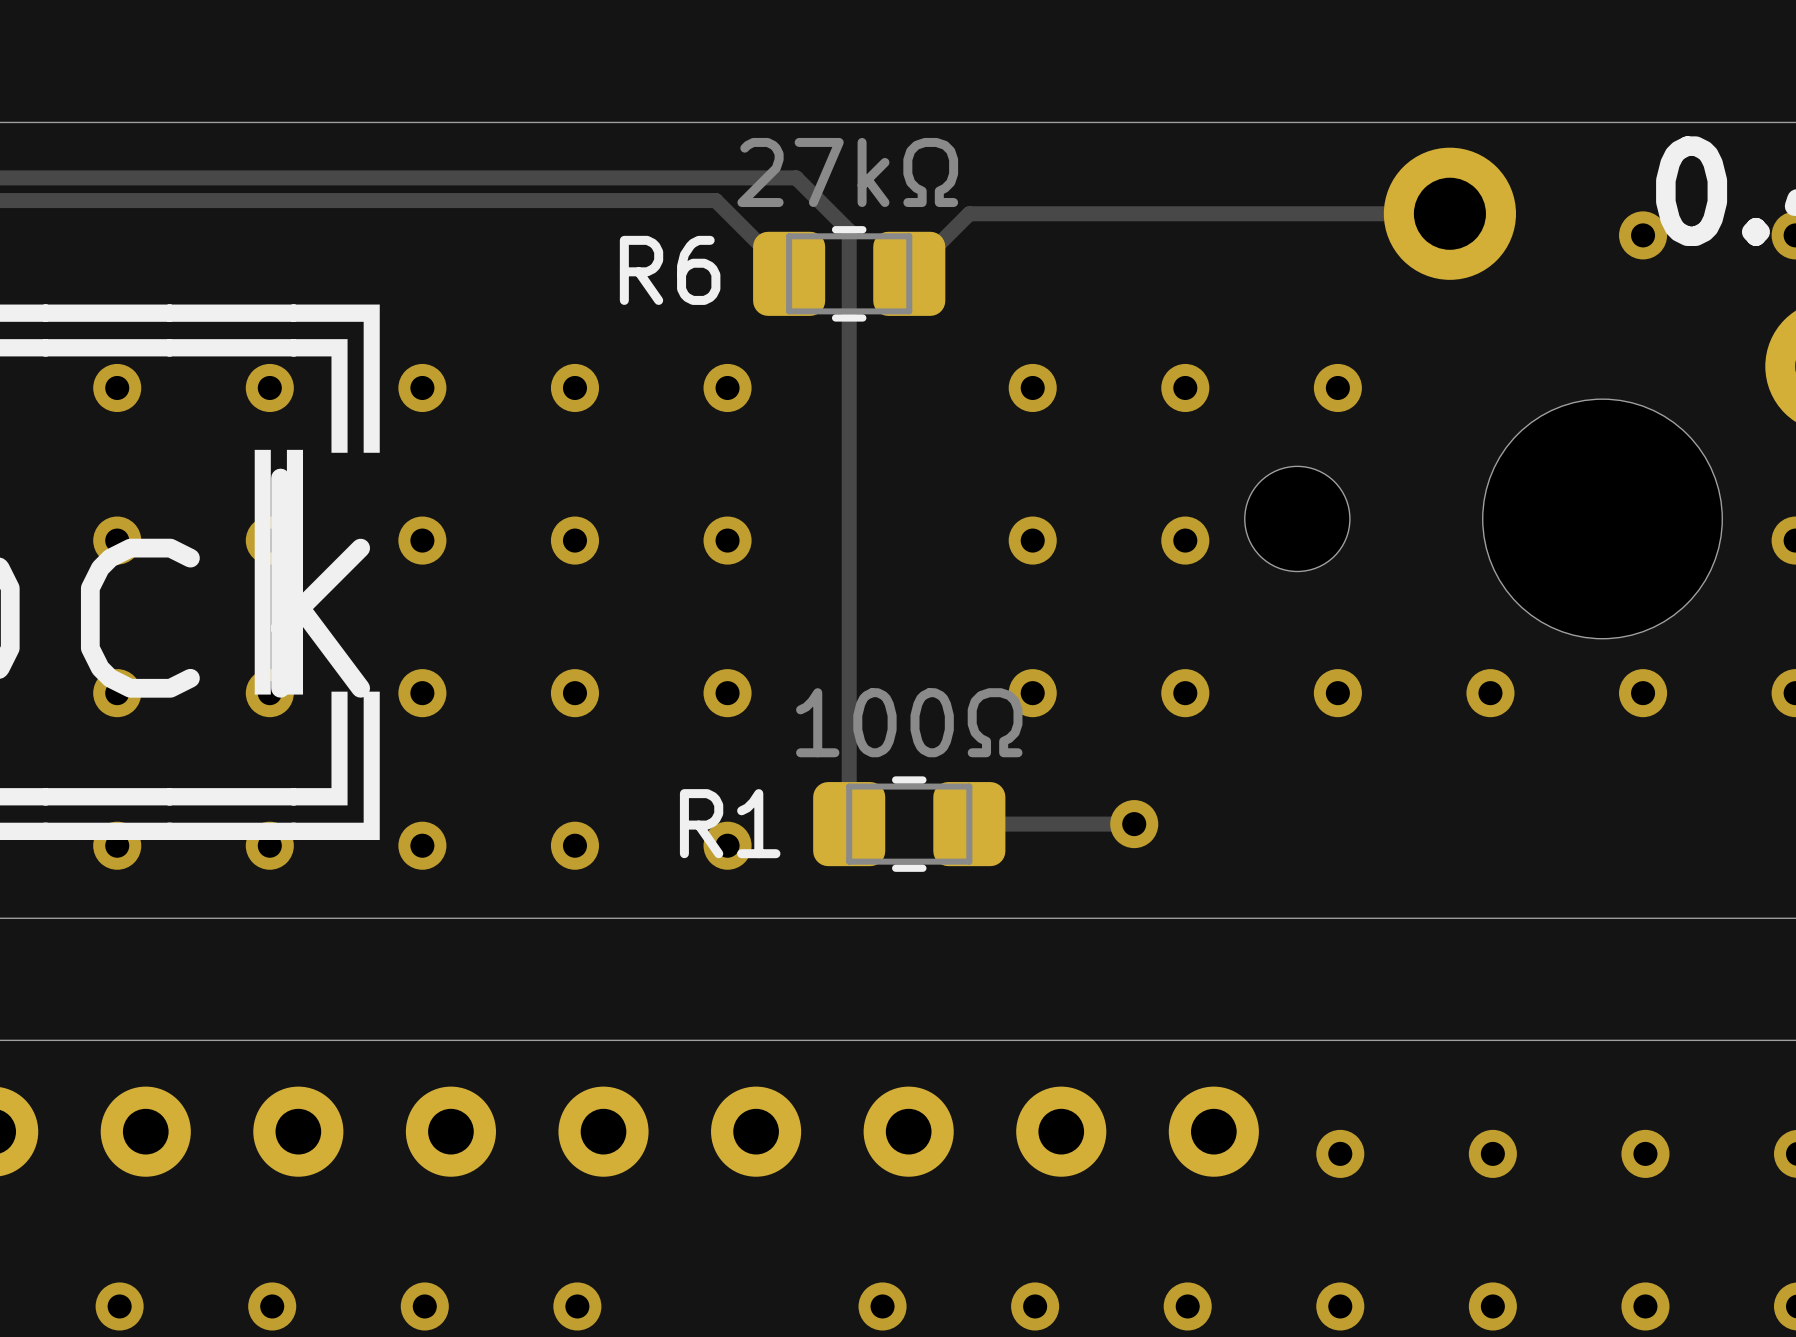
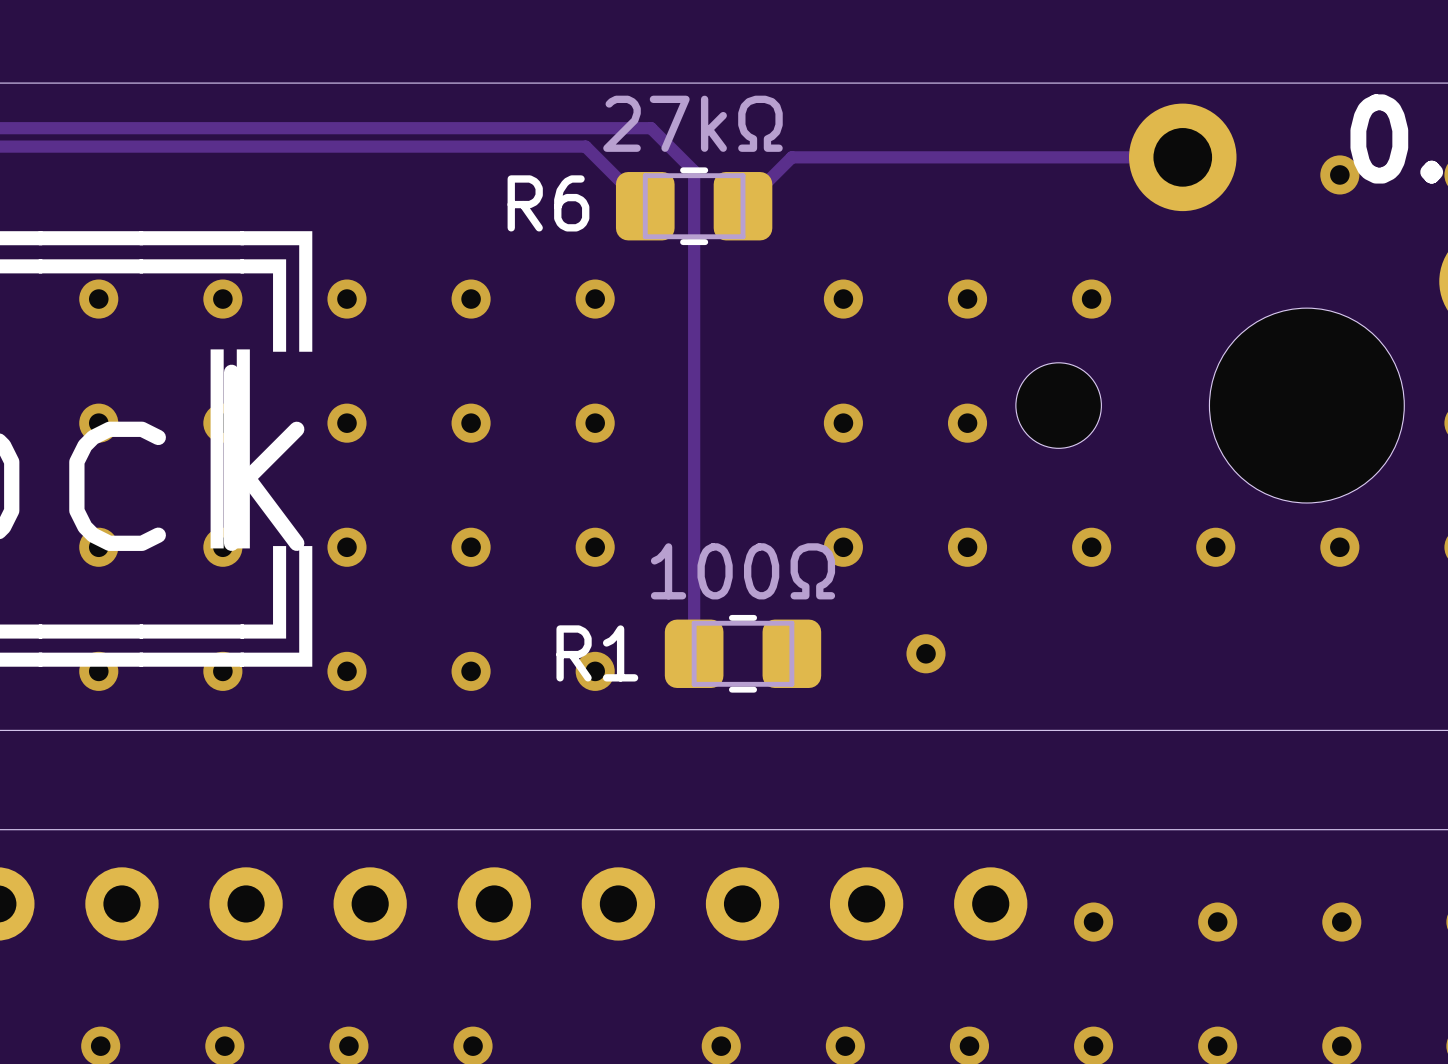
track: (969, 824) (1134, 824) -> none

